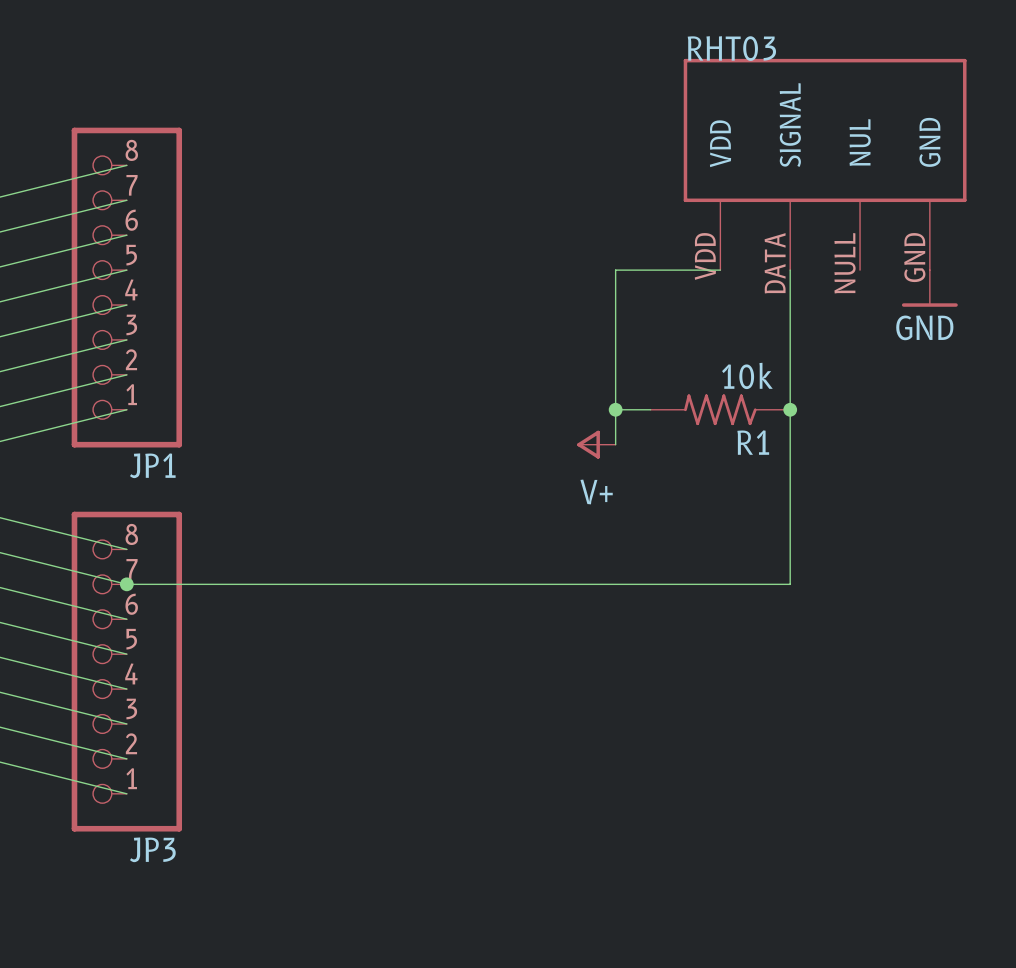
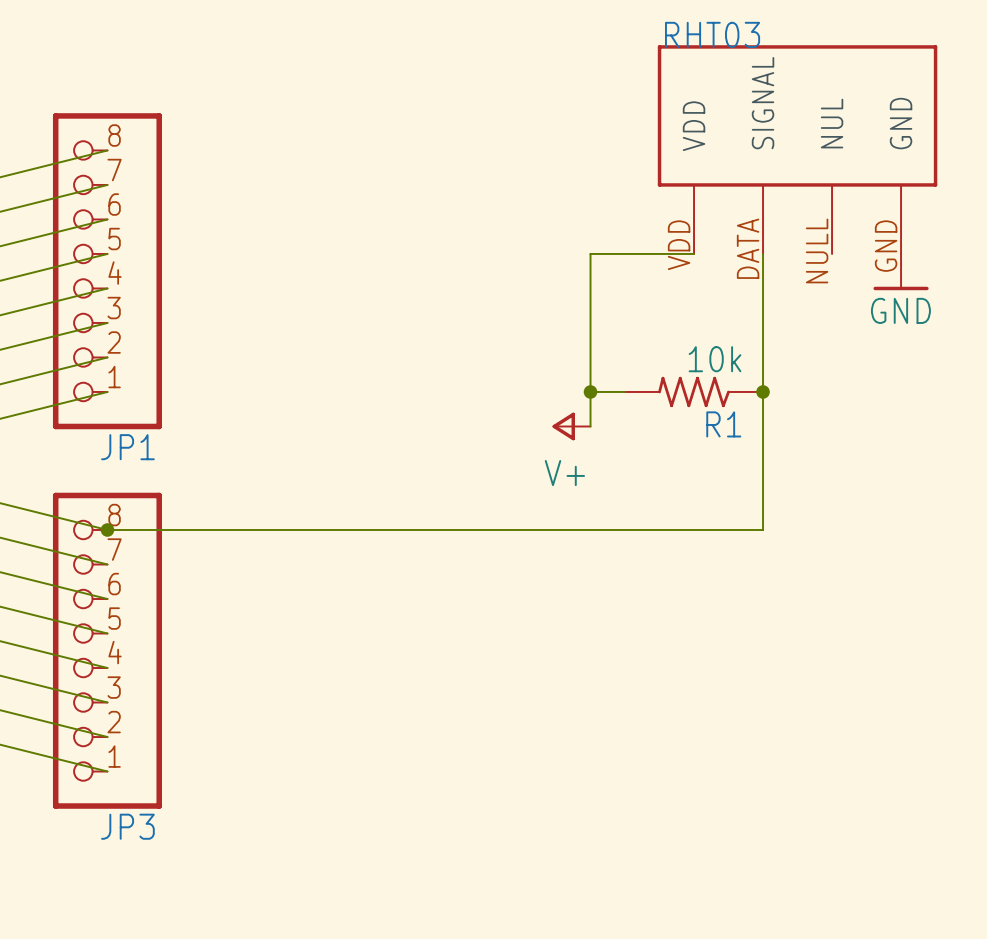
wire: (790, 549) (790, 584) (126, 584) -> (763, 529) (107, 529)
junction position: (126, 584) -> (107, 529)

